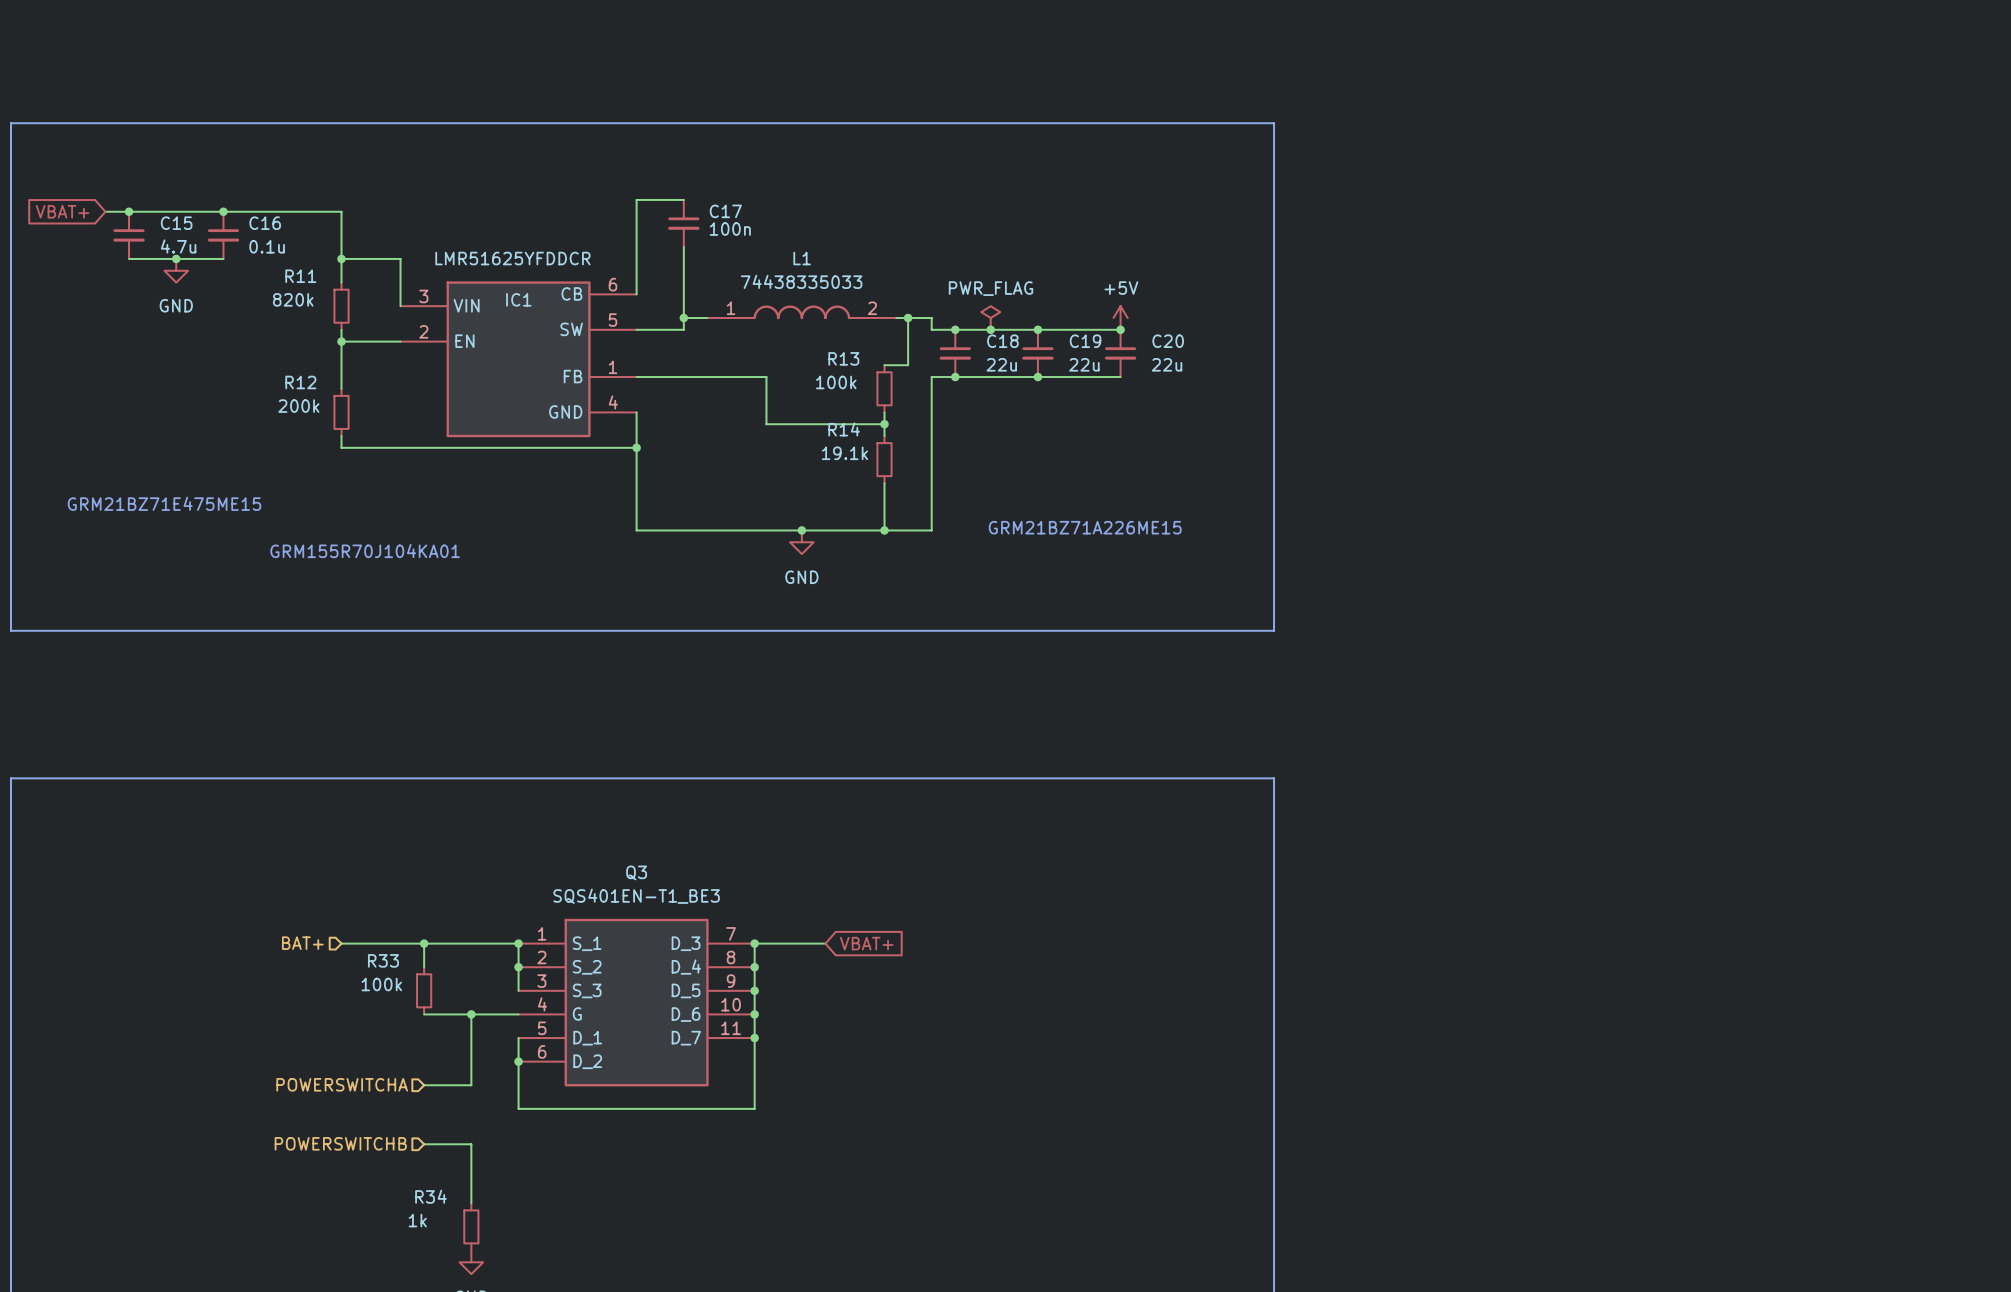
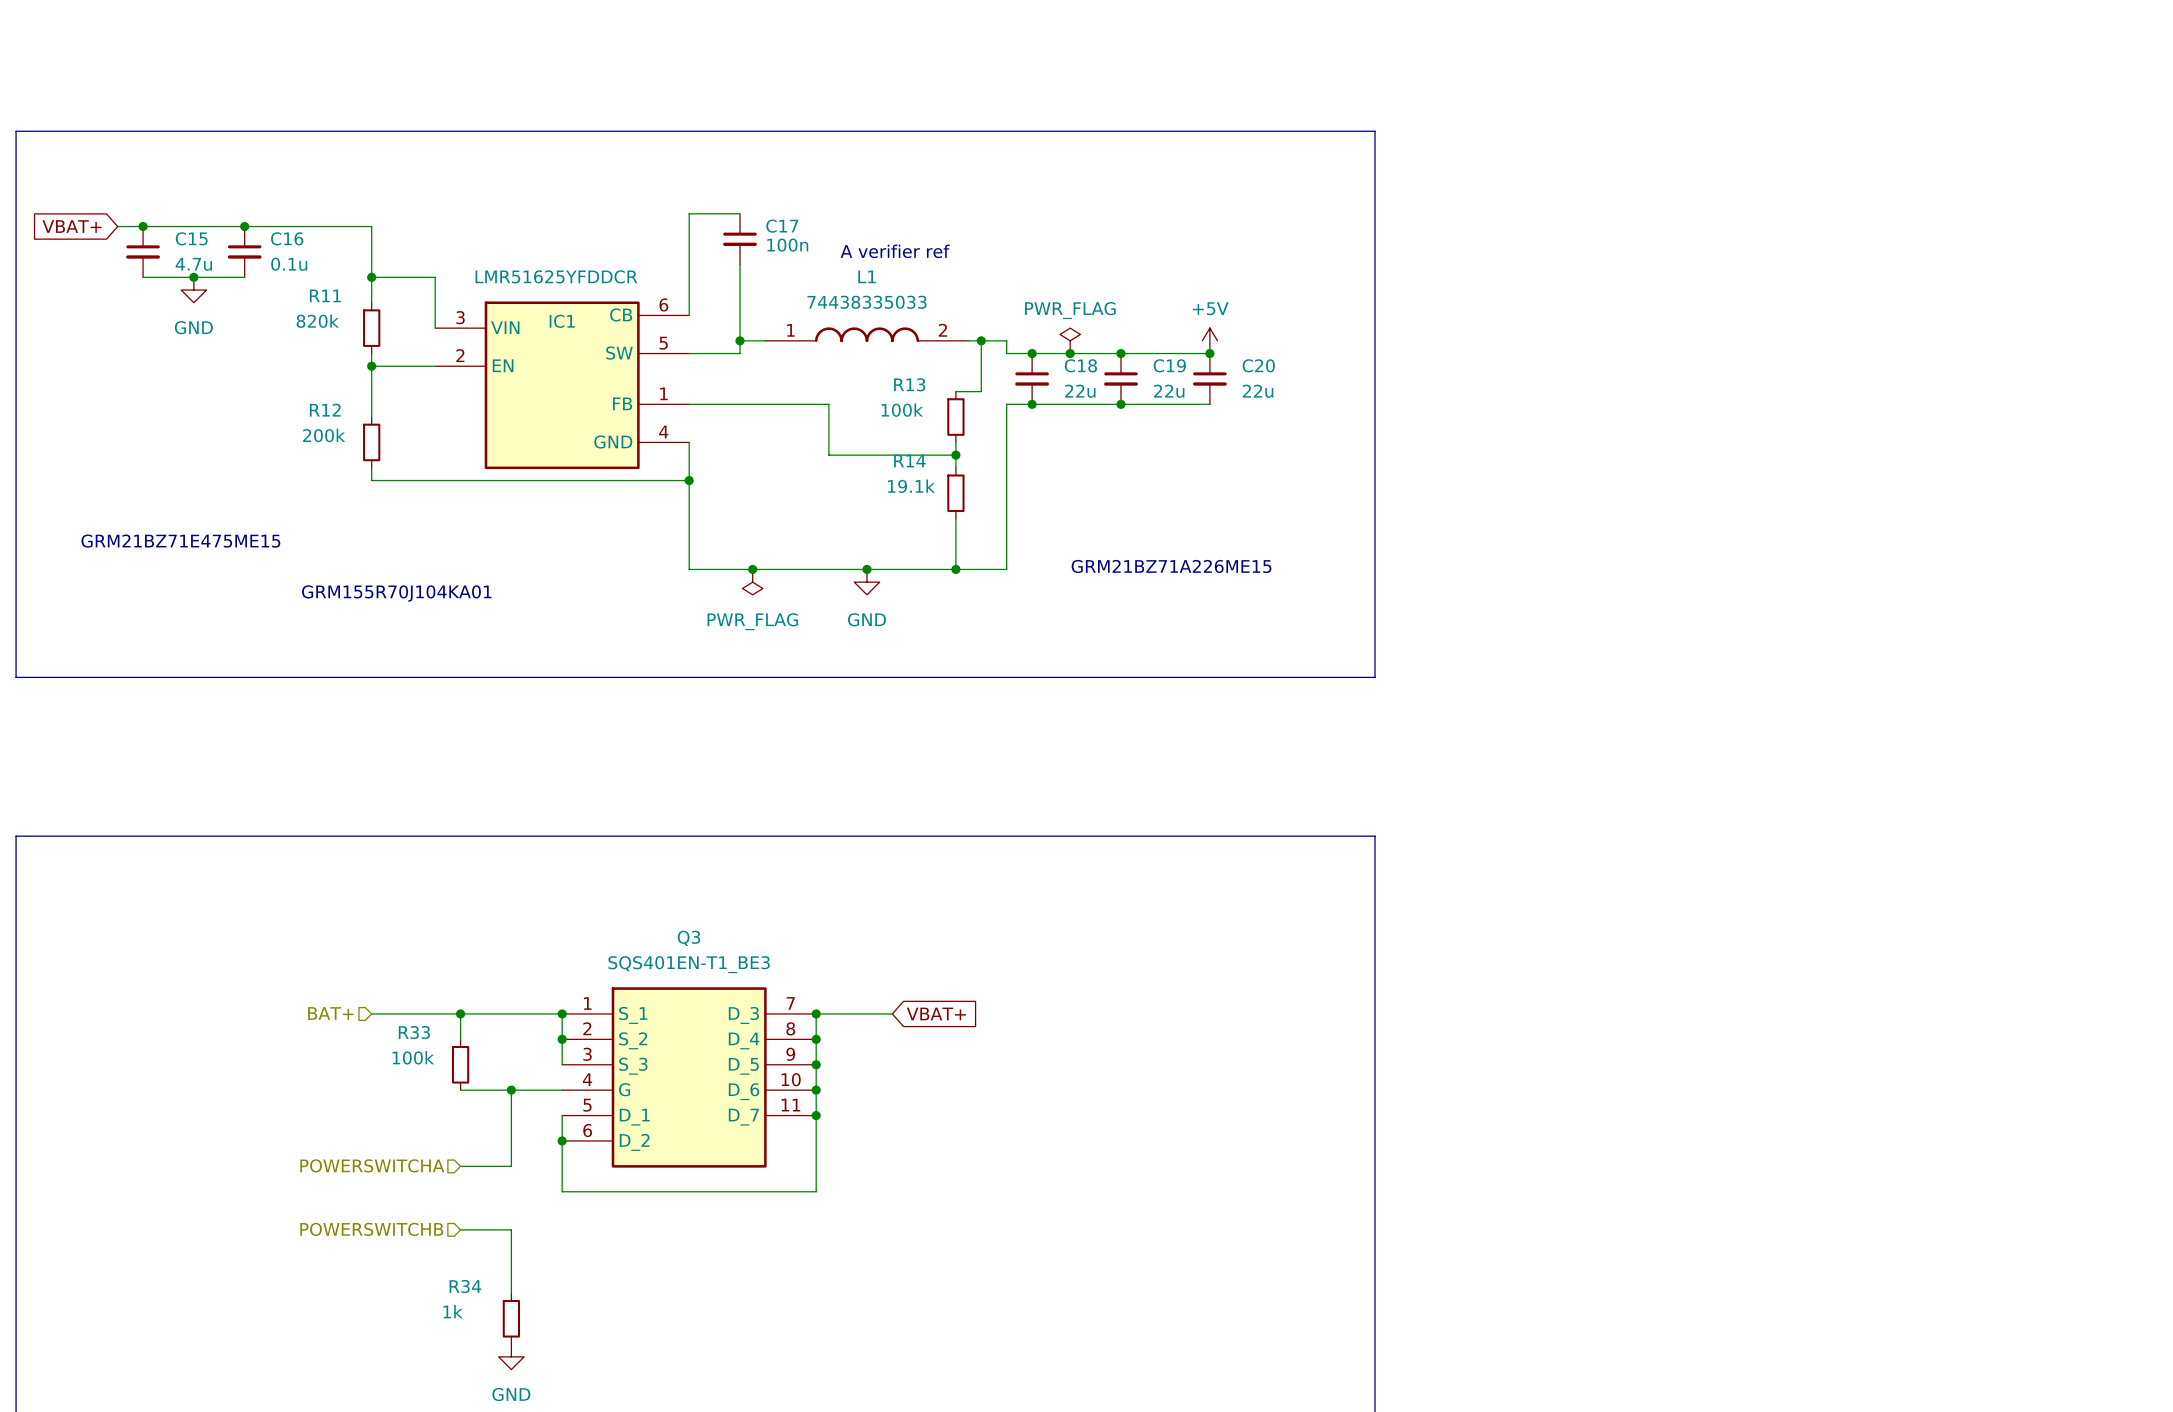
text: none -> A verifier ref (895, 251)
junction: none -> (752, 569)
power symbol: none -> PWR_FLAG (752, 582)

